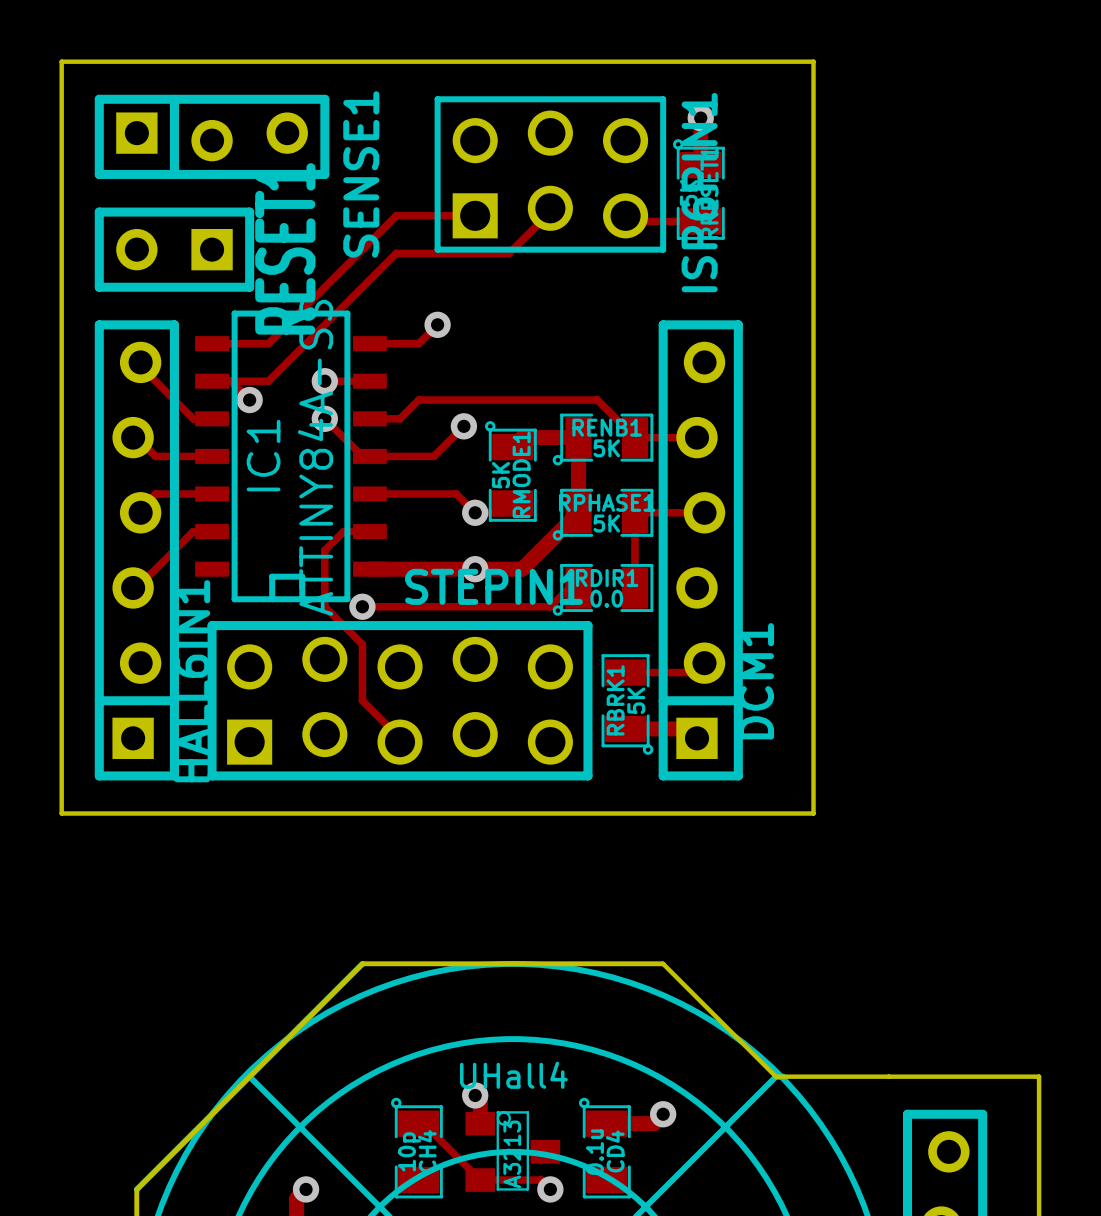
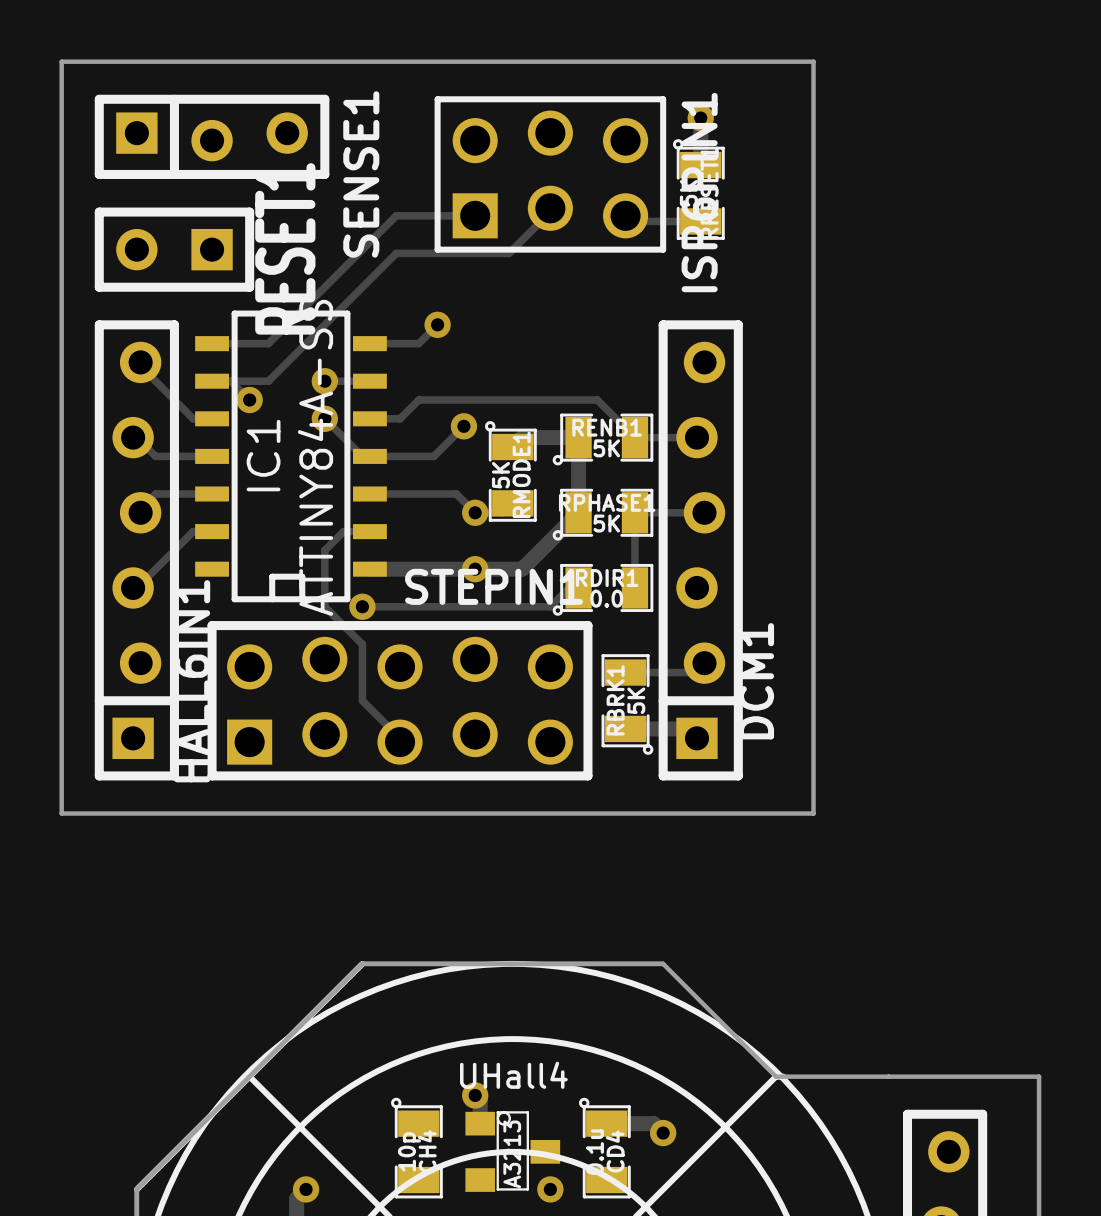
via position: (663, 1114) -> (663, 1133)
track: (418, 1123) (423, 1123) (480, 1180) (540, 1180) (550, 1189) -> none

